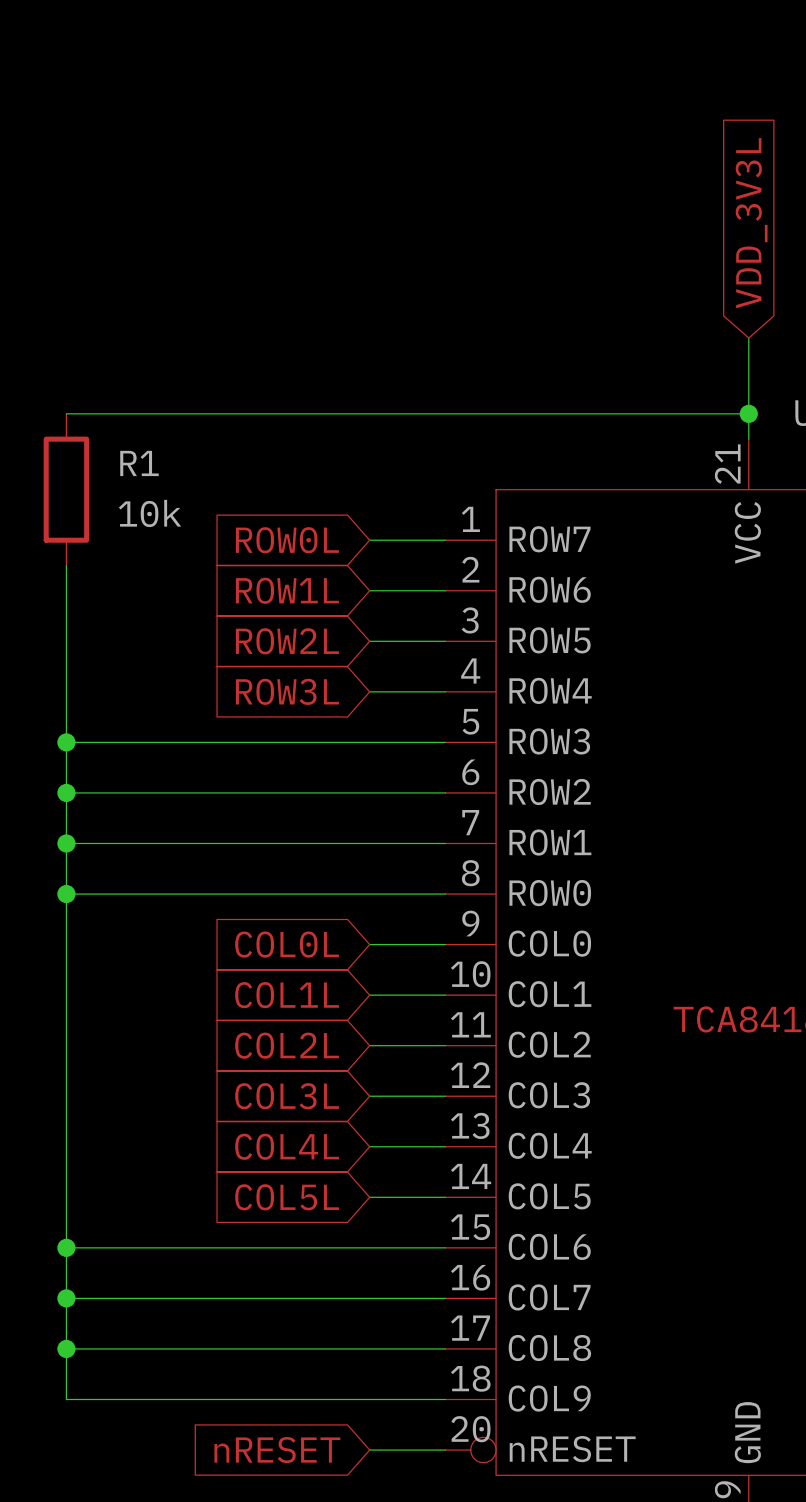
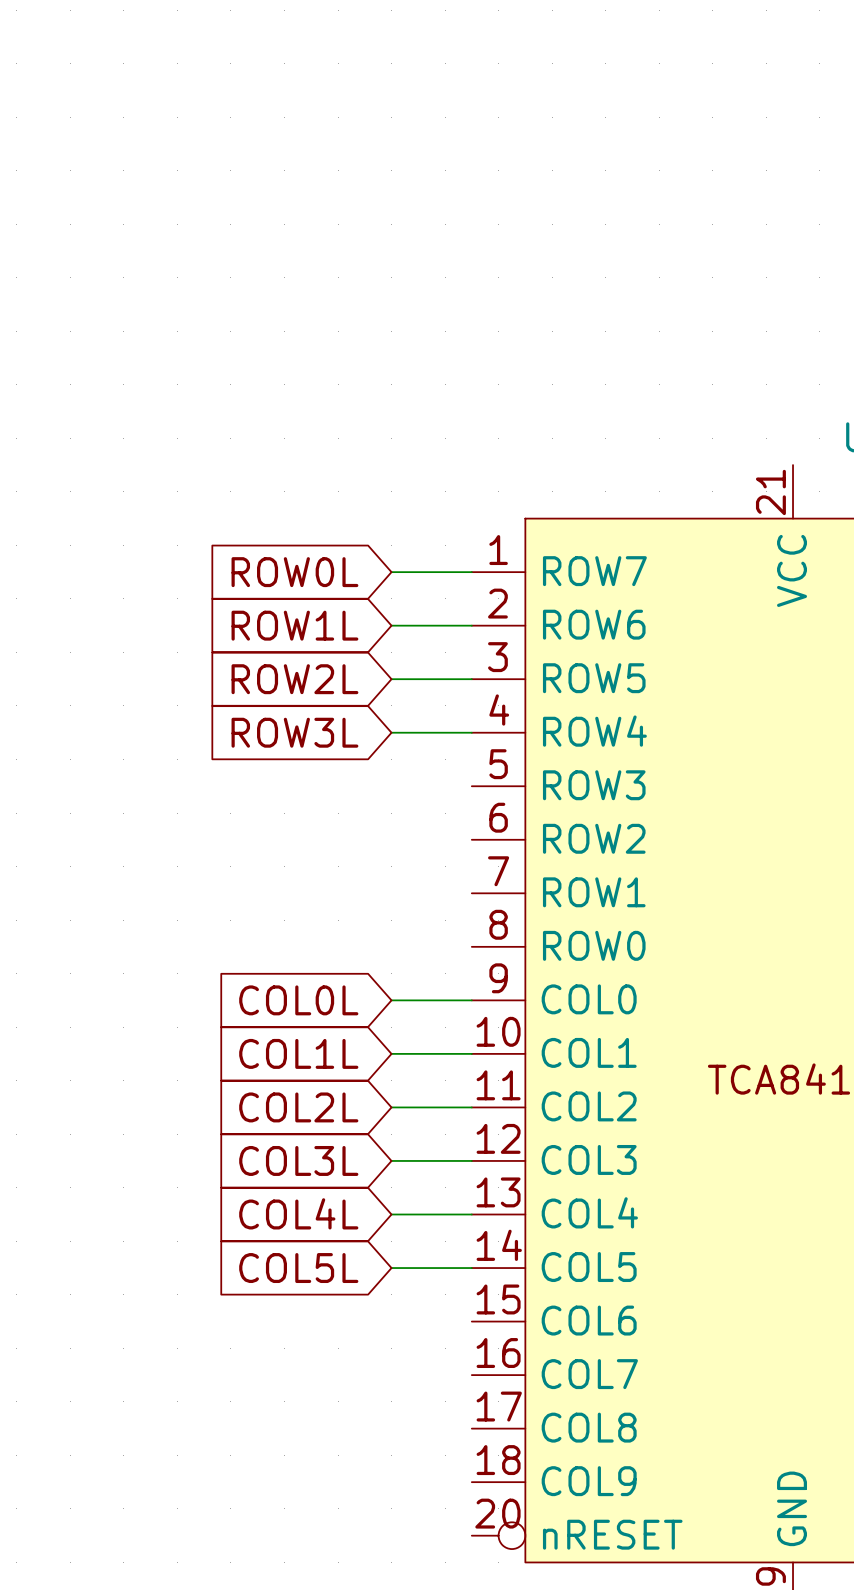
global label: VDD_3V3L (751, 223) -> none
wire: (748, 338) (748, 439) -> none
wire: (66, 413) (748, 413) -> none
junction: (748, 413) -> none
R1: 10k (66, 489) -> none
wire: (66, 565) (66, 1399) (445, 1399) -> none
wire: (66, 742) (445, 742) -> none
junction: (66, 742) -> none
wire: (66, 792) (445, 792) -> none
junction: (66, 792) -> none
wire: (66, 843) (445, 843) -> none
junction: (66, 843) -> none
wire: (66, 894) (445, 894) -> none
junction: (66, 894) -> none
wire: (66, 1247) (445, 1247) -> none
junction: (66, 1247) -> none
wire: (66, 1298) (445, 1298) -> none
junction: (66, 1298) -> none
wire: (66, 1348) (445, 1348) -> none
junction: (66, 1348) -> none
global label: nRESET (277, 1450) -> none
wire: (369, 1450) (445, 1450) -> none

